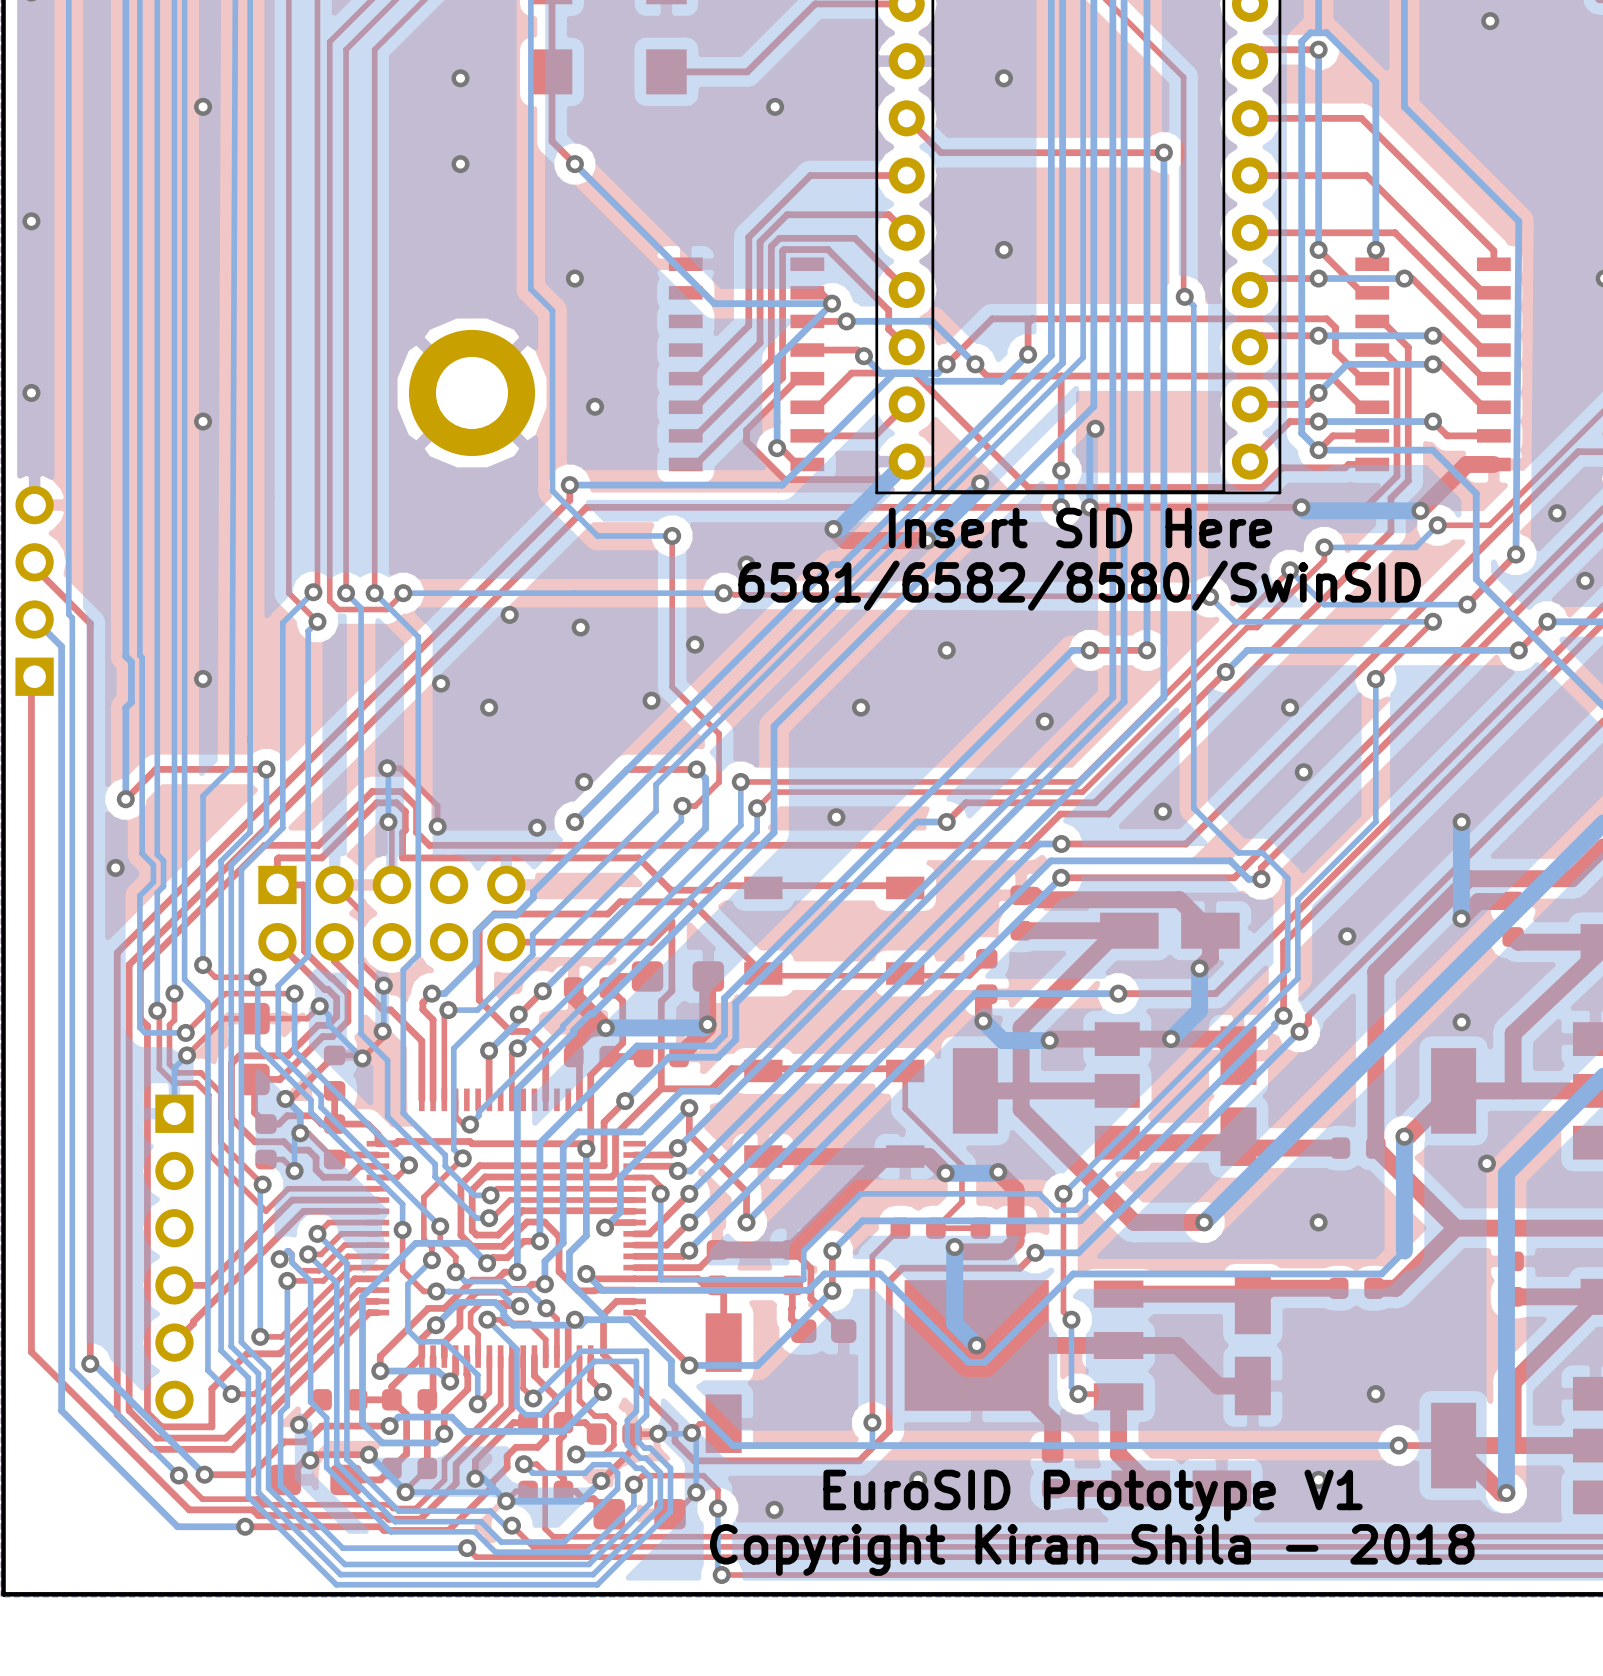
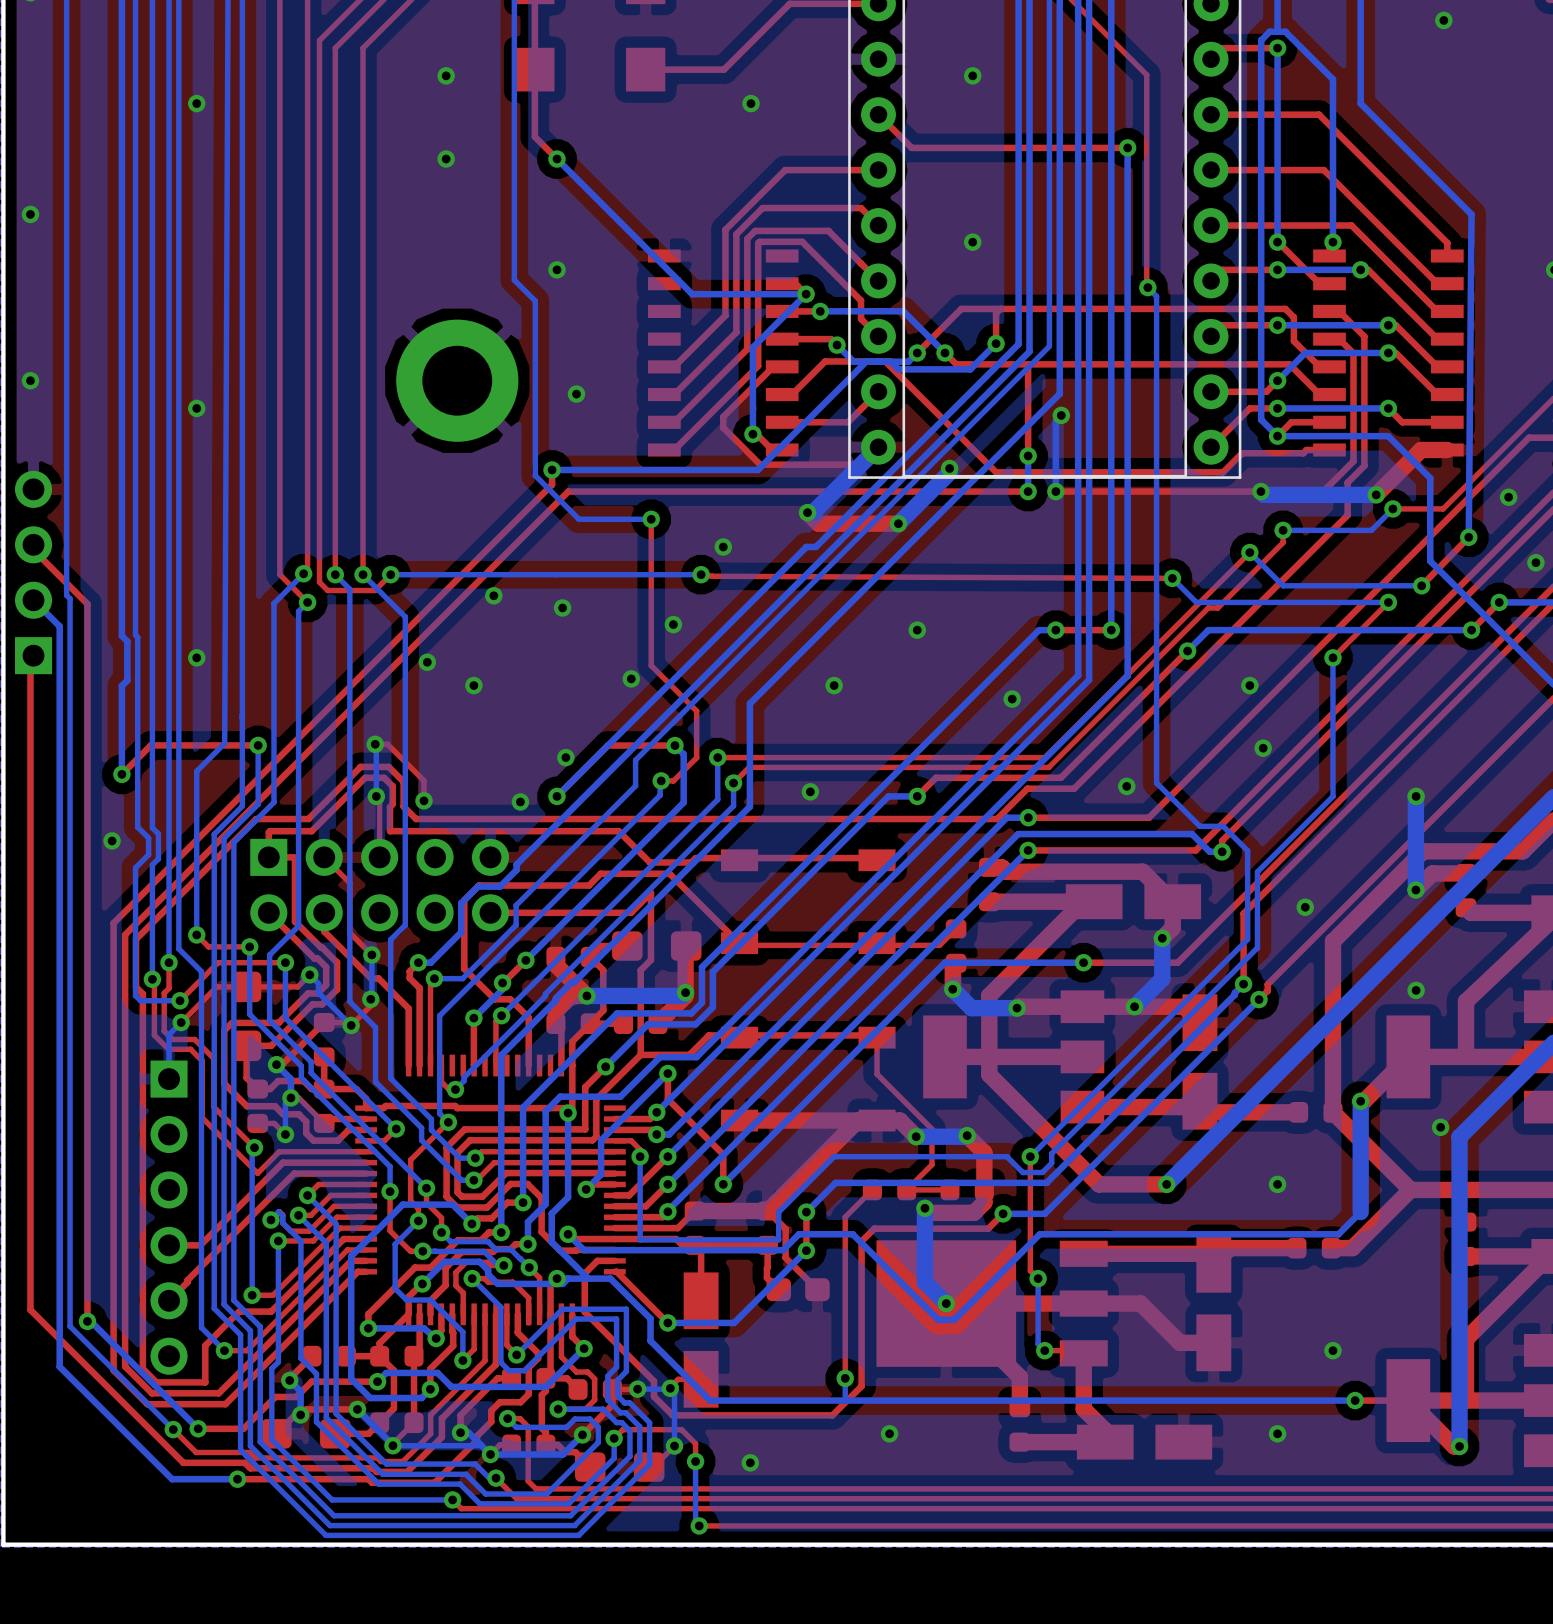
text: Insert SID Here (1080, 528) -> none
text: 6581/6582/8580/SwinSID (1079, 585) -> none
text: EuroSID Prototype V1 (1093, 1495) -> none
text: Copyright Kiran Shila - 2018 (1092, 1549) -> none

